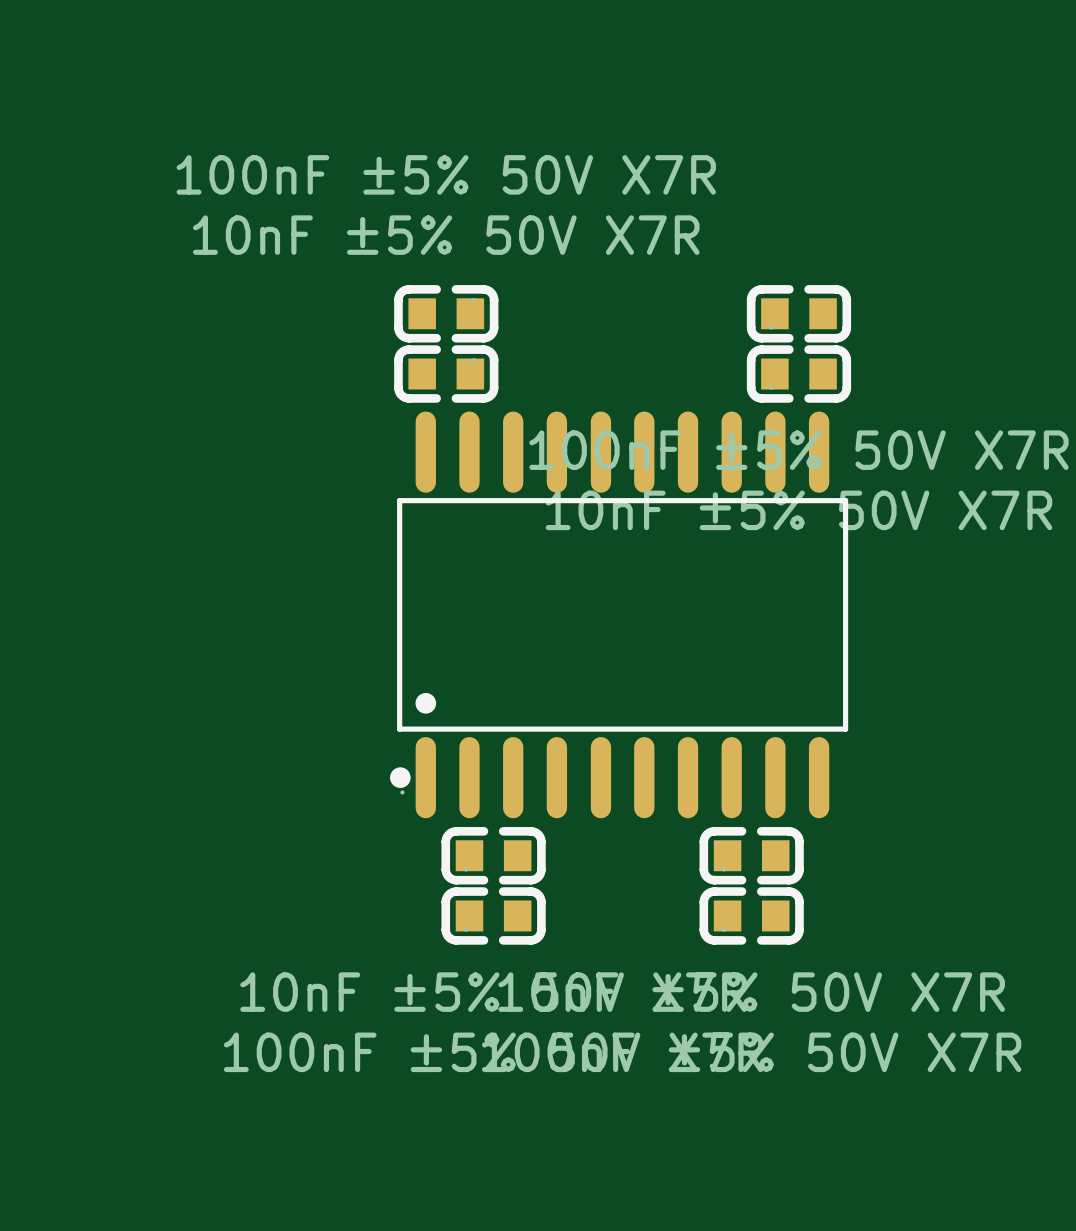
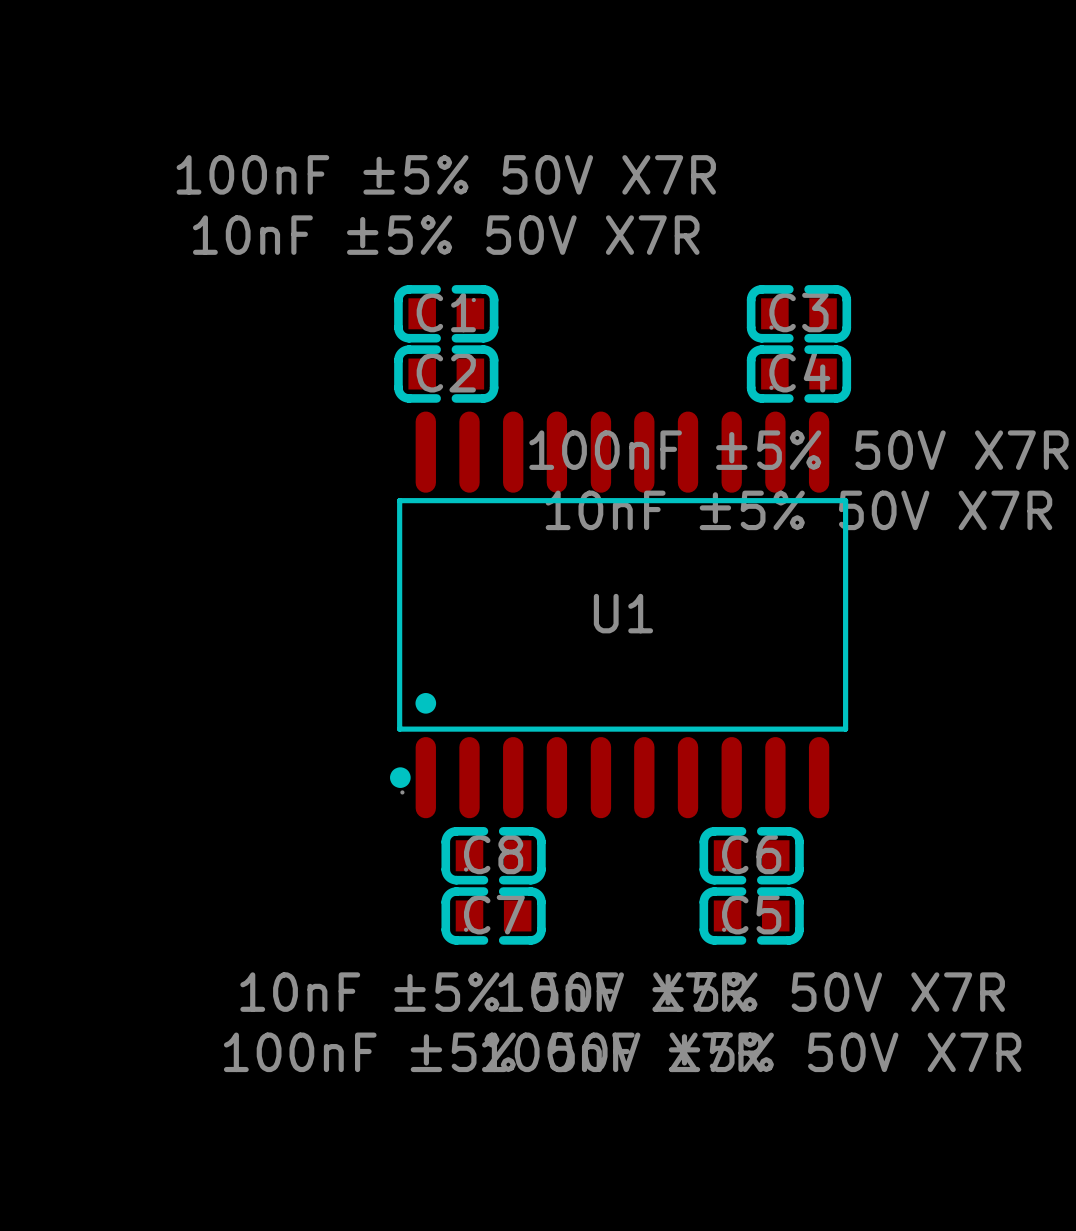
C1 name: none -> C1 (446, 312)
C3 name: none -> C3 (798, 312)
C4 name: none -> C4 (799, 371)
C2 name: none -> C2 (446, 372)
U1 name: none -> U1 (623, 613)
C8 name: none -> C8 (493, 854)
C6 name: none -> C6 (751, 854)
C7 name: none -> C7 (494, 914)
C5 name: none -> C5 (751, 914)

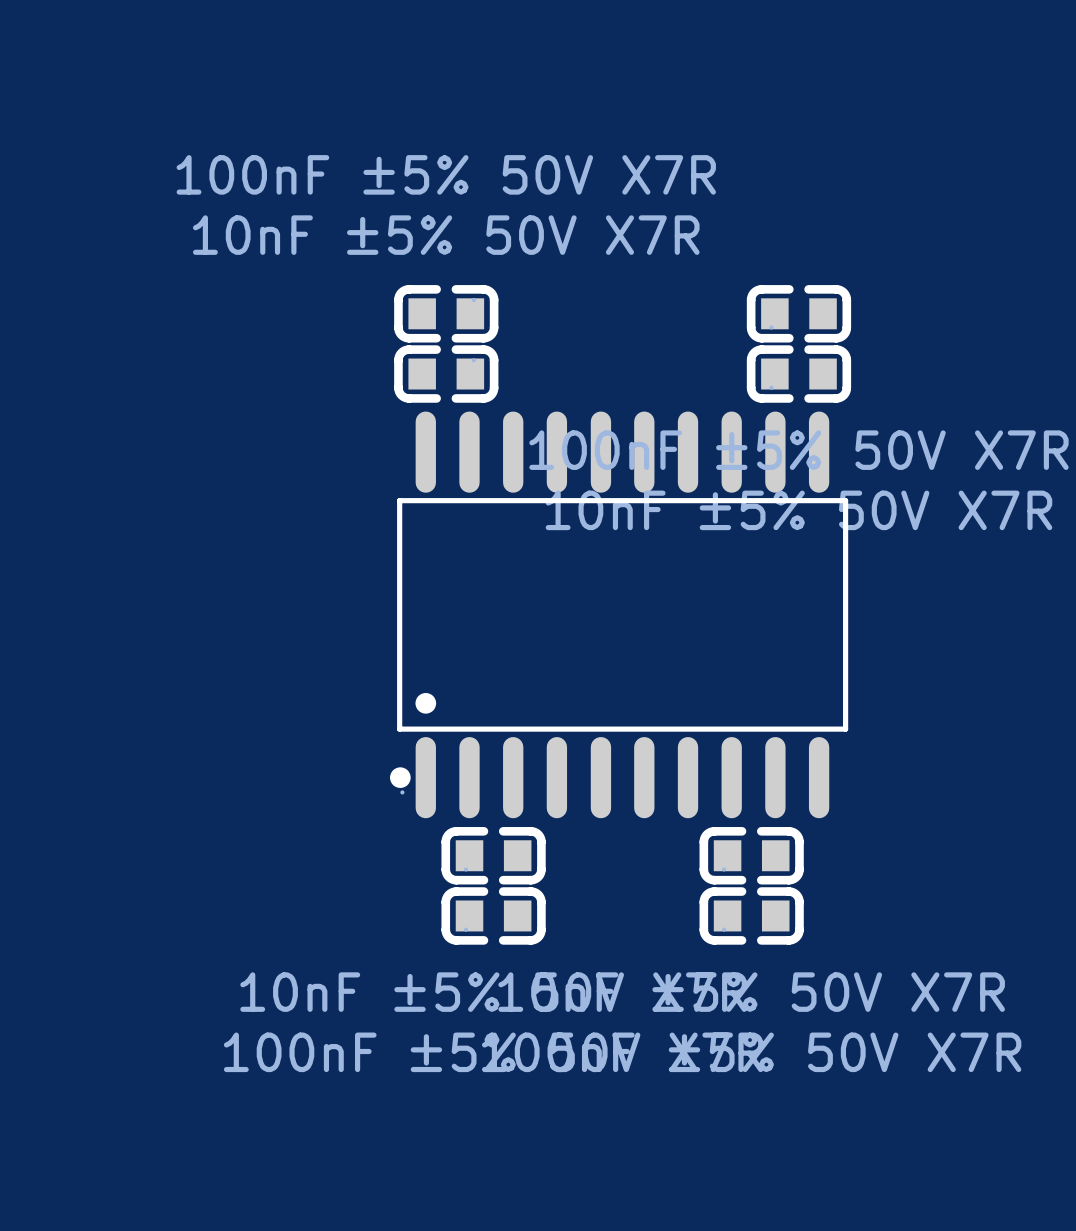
C1 name: C1 (446, 312) -> none
C3 name: C3 (798, 312) -> none
C4 name: C4 (799, 371) -> none
C2 name: C2 (446, 372) -> none
U1 name: U1 (623, 613) -> none
C8 name: C8 (493, 854) -> none
C6 name: C6 (751, 854) -> none
C7 name: C7 (494, 914) -> none
C5 name: C5 (751, 914) -> none

